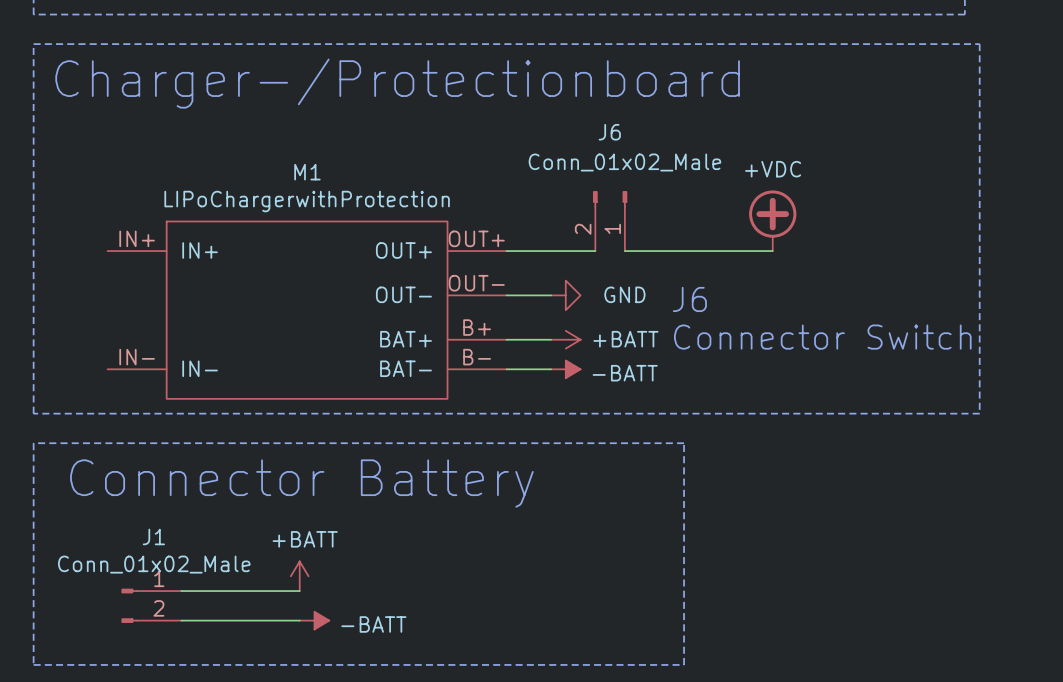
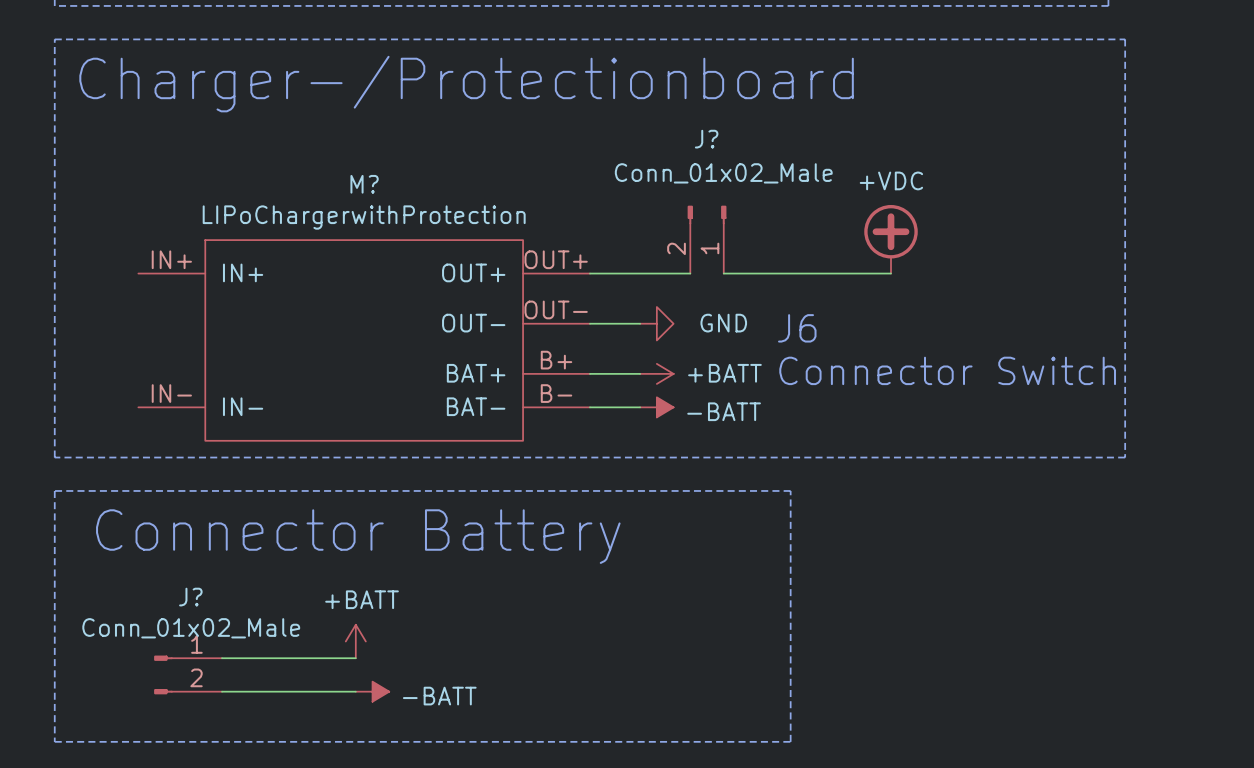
J6 name: J6 (609, 132) -> J? (706, 139)
M1 name: M1 (307, 172) -> M? (364, 184)
J1 name: J1 (153, 536) -> J? (190, 597)

